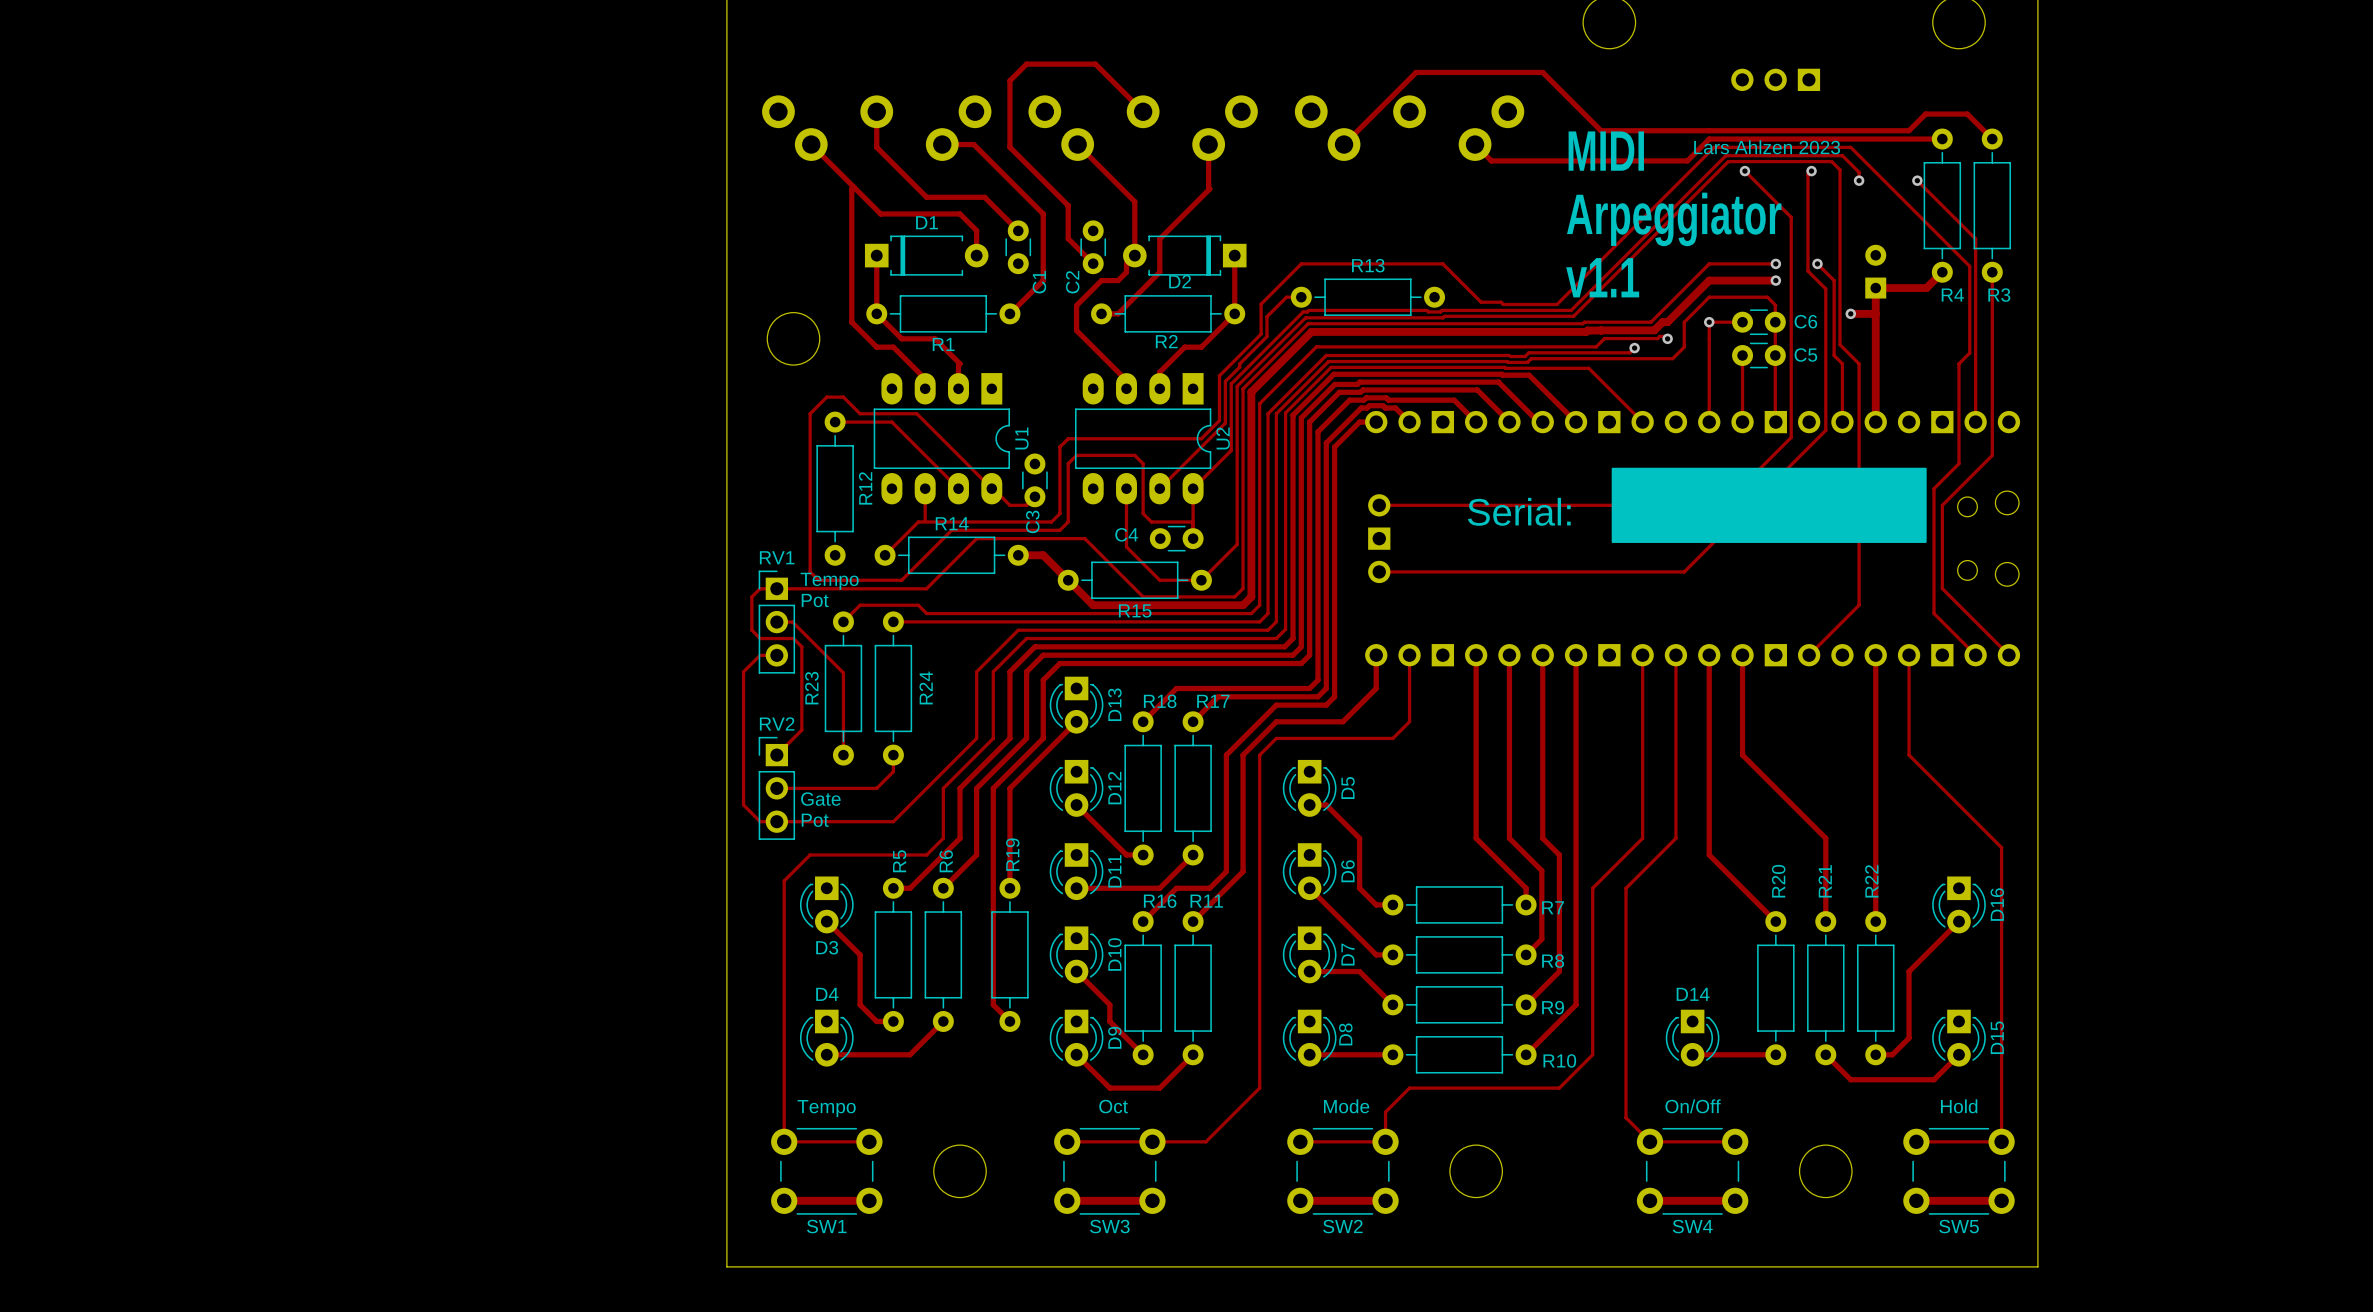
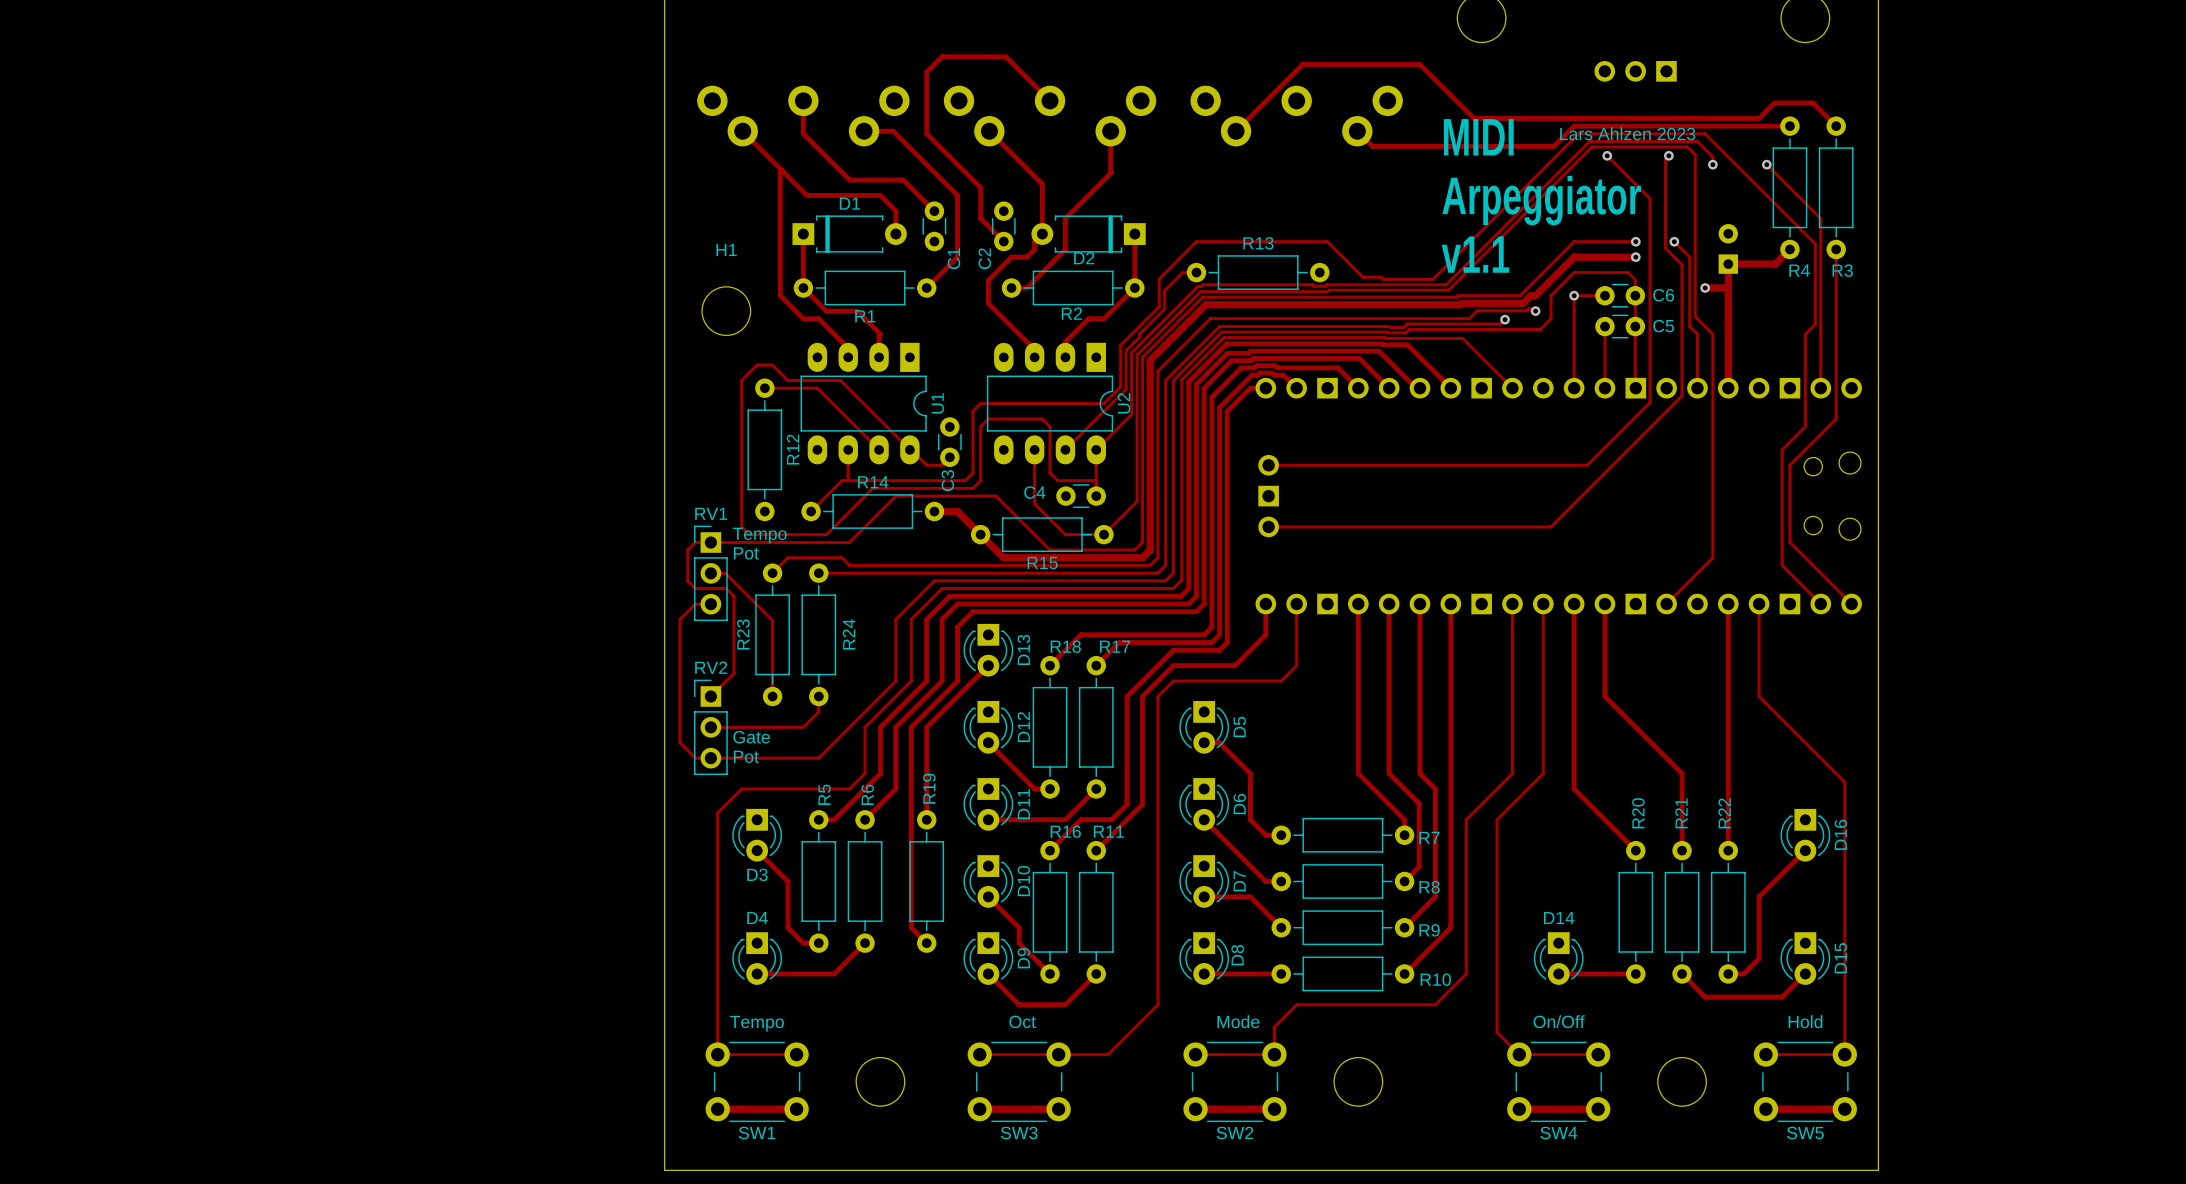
H1 name: none -> H1 (726, 249)
drawing: [1611, 467, 1927, 543] -> none
text: Serial: (1519, 511) -> none

